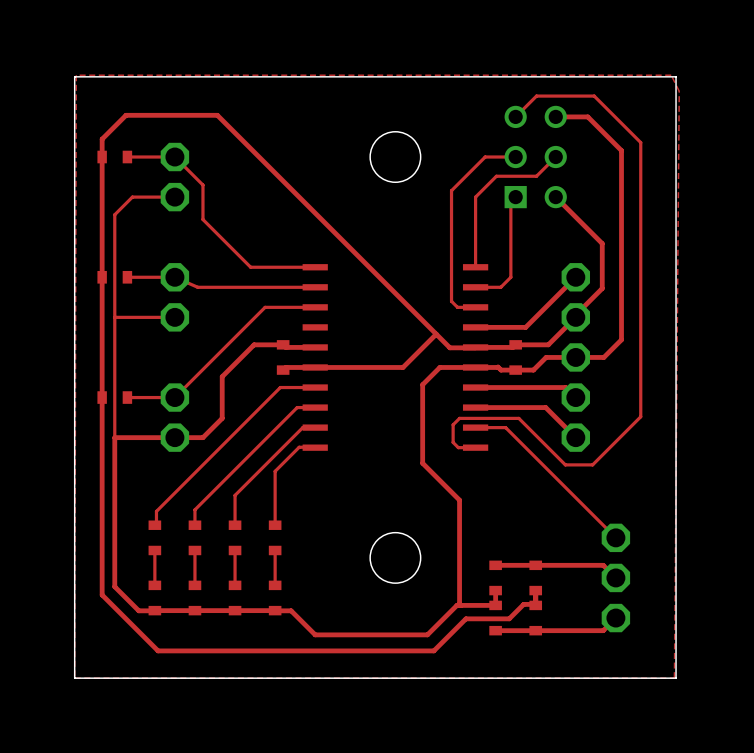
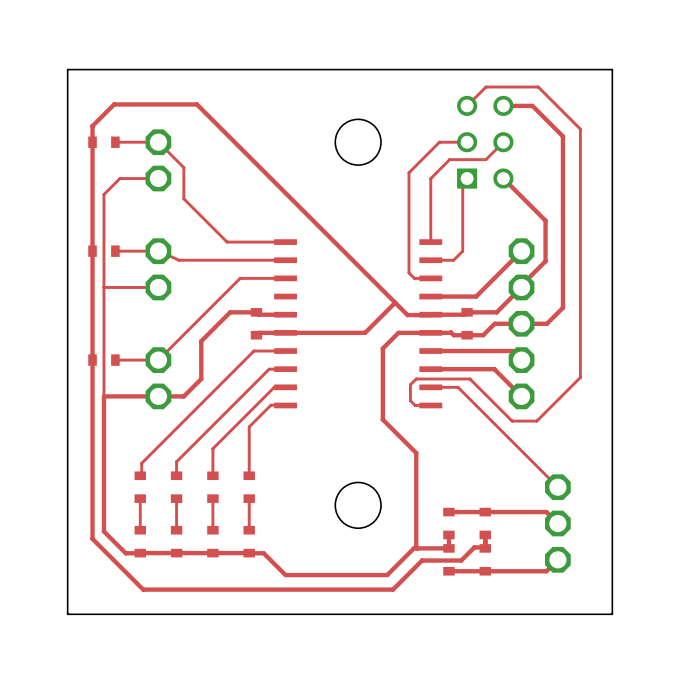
top zone outline: (671, 75) (76, 75) (74, 678) (674, 678) (679, 91) (671, 75) -> none

